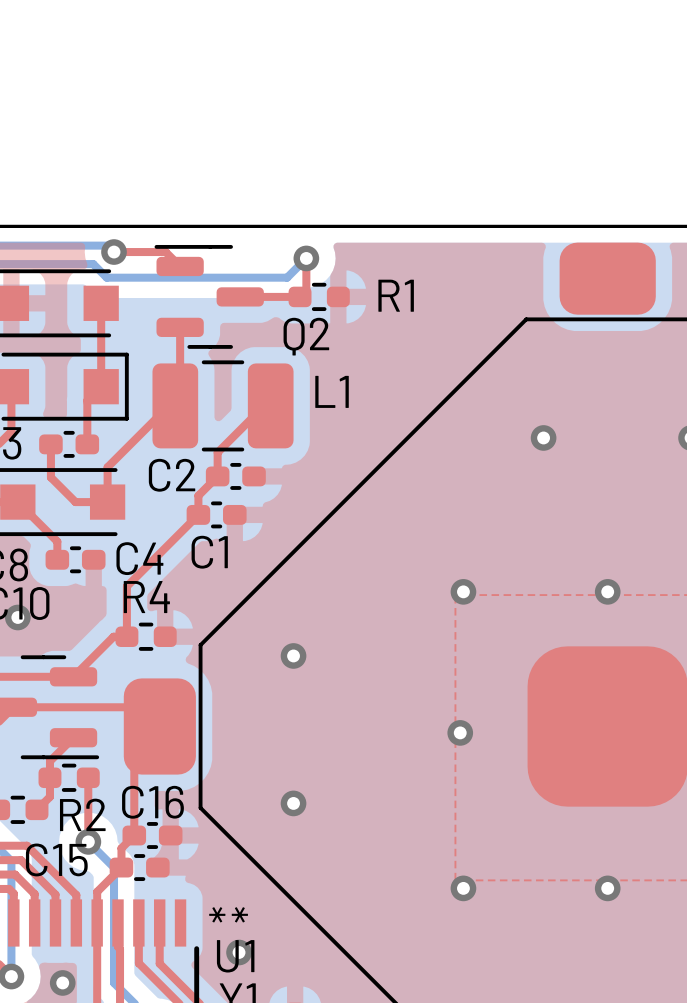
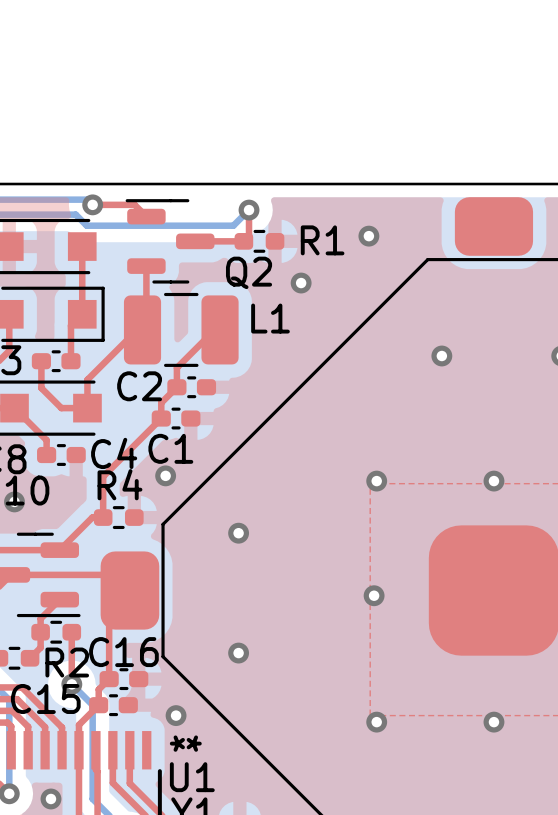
via: none -> (368, 236)
via: none -> (301, 283)
via: none -> (165, 475)
via position: (239, 952) -> (176, 715)

